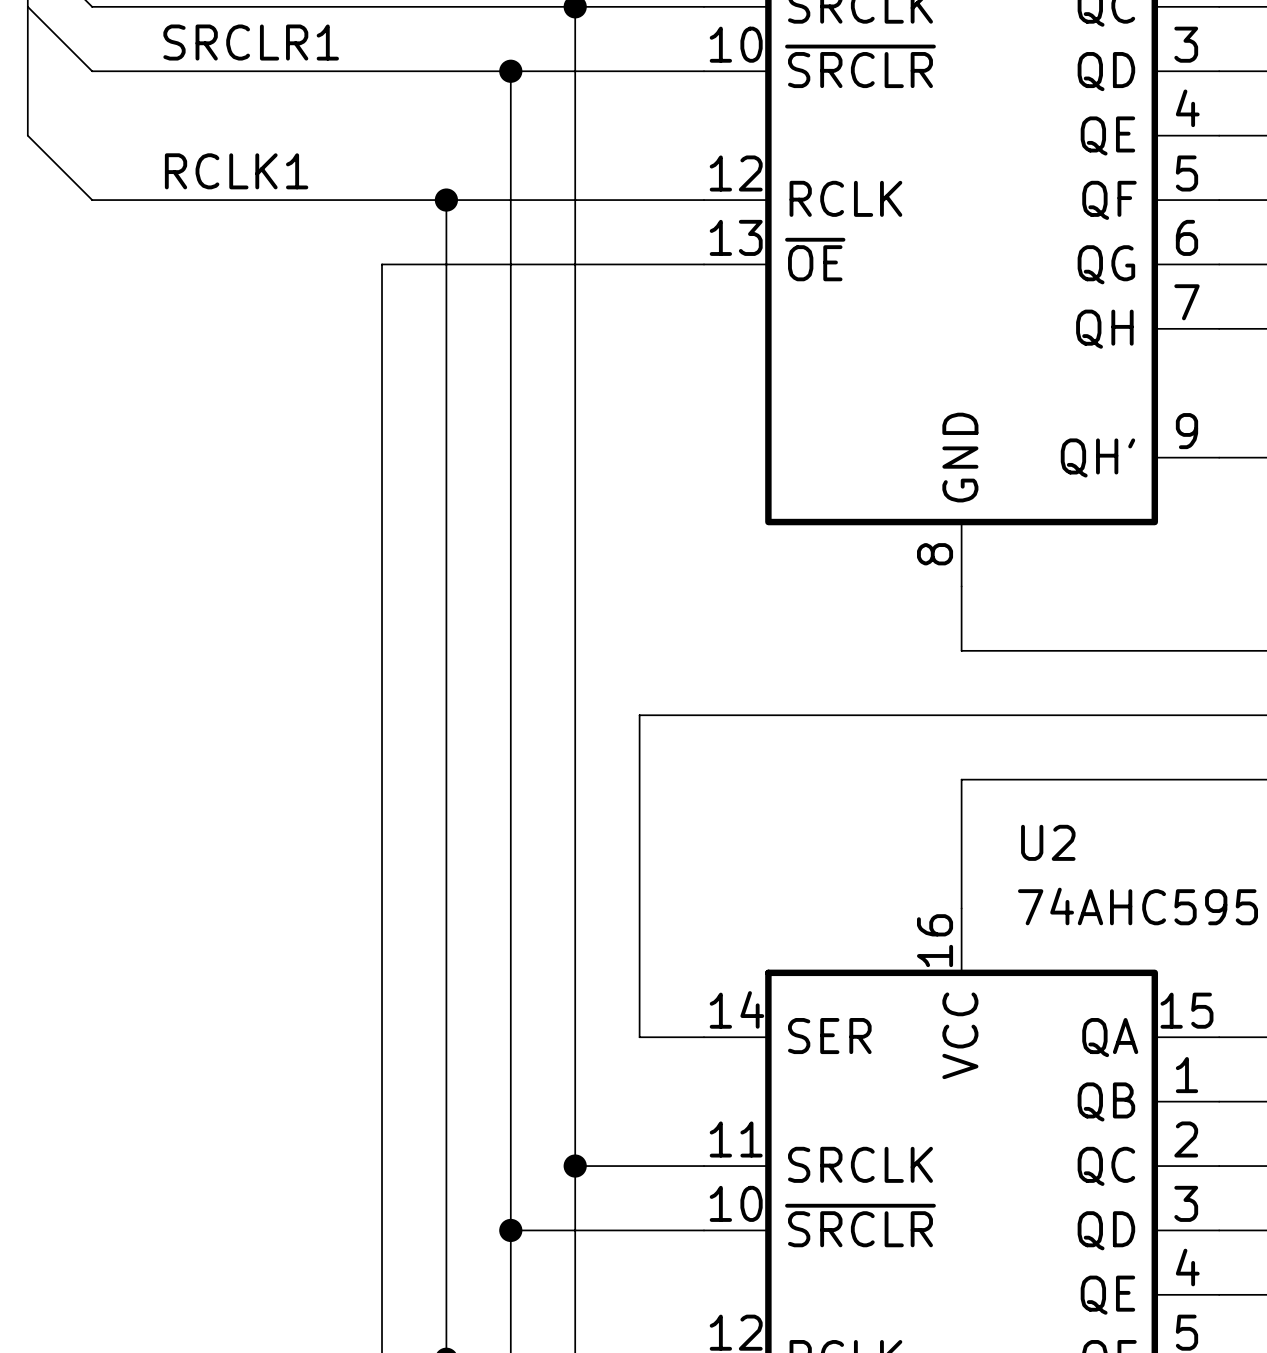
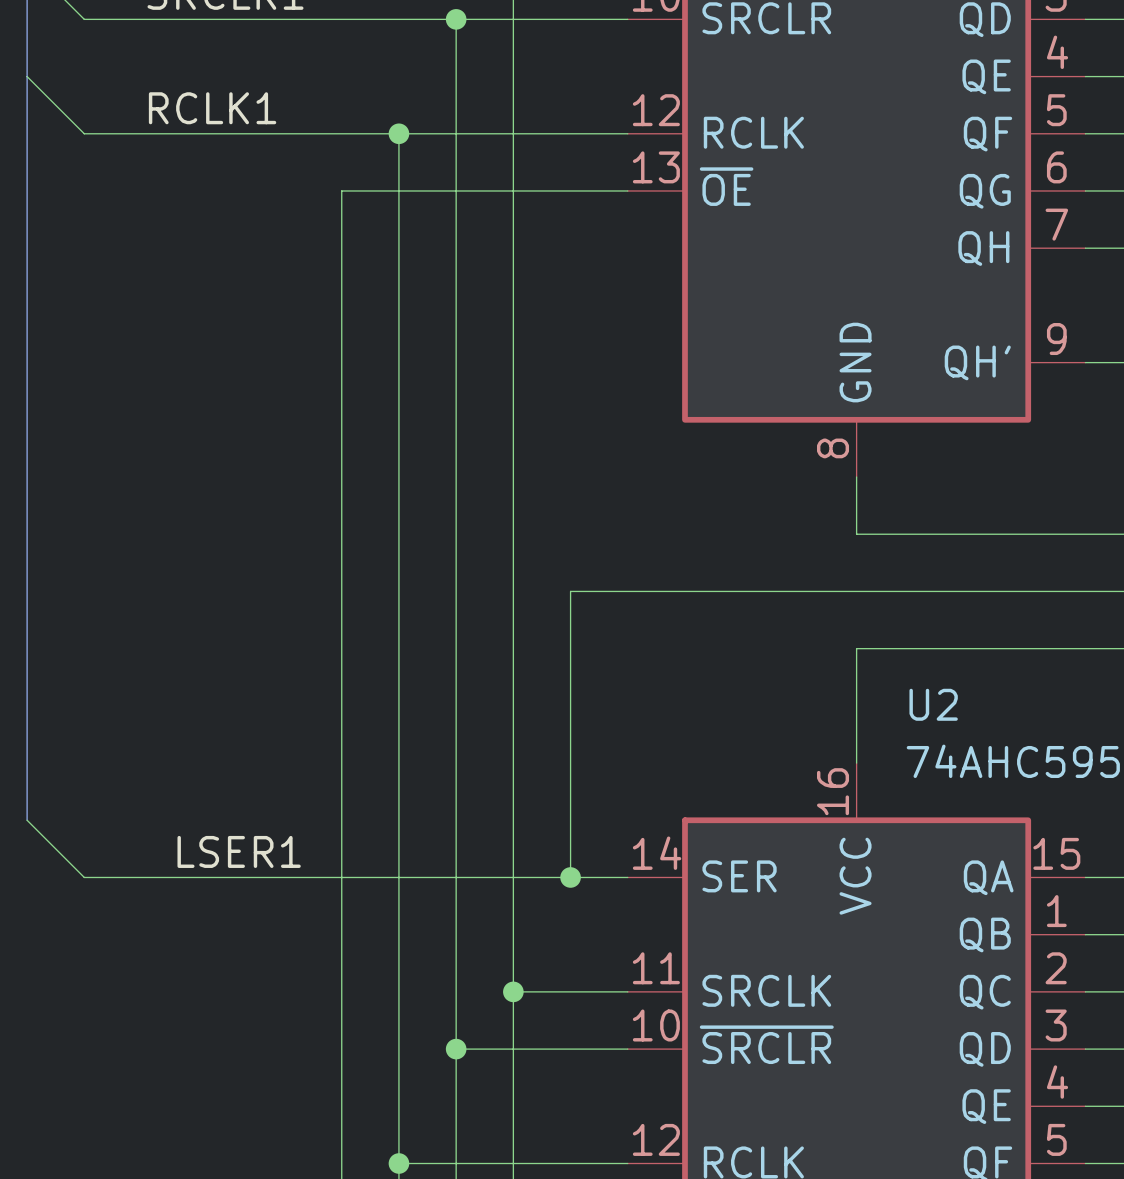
bus: none -> (27, 76) (27, 820)
wire: none -> (27, 820) (84, 877) (570, 877)
label: none -> LSER1 (239, 851)
junction: none -> (570, 877)

